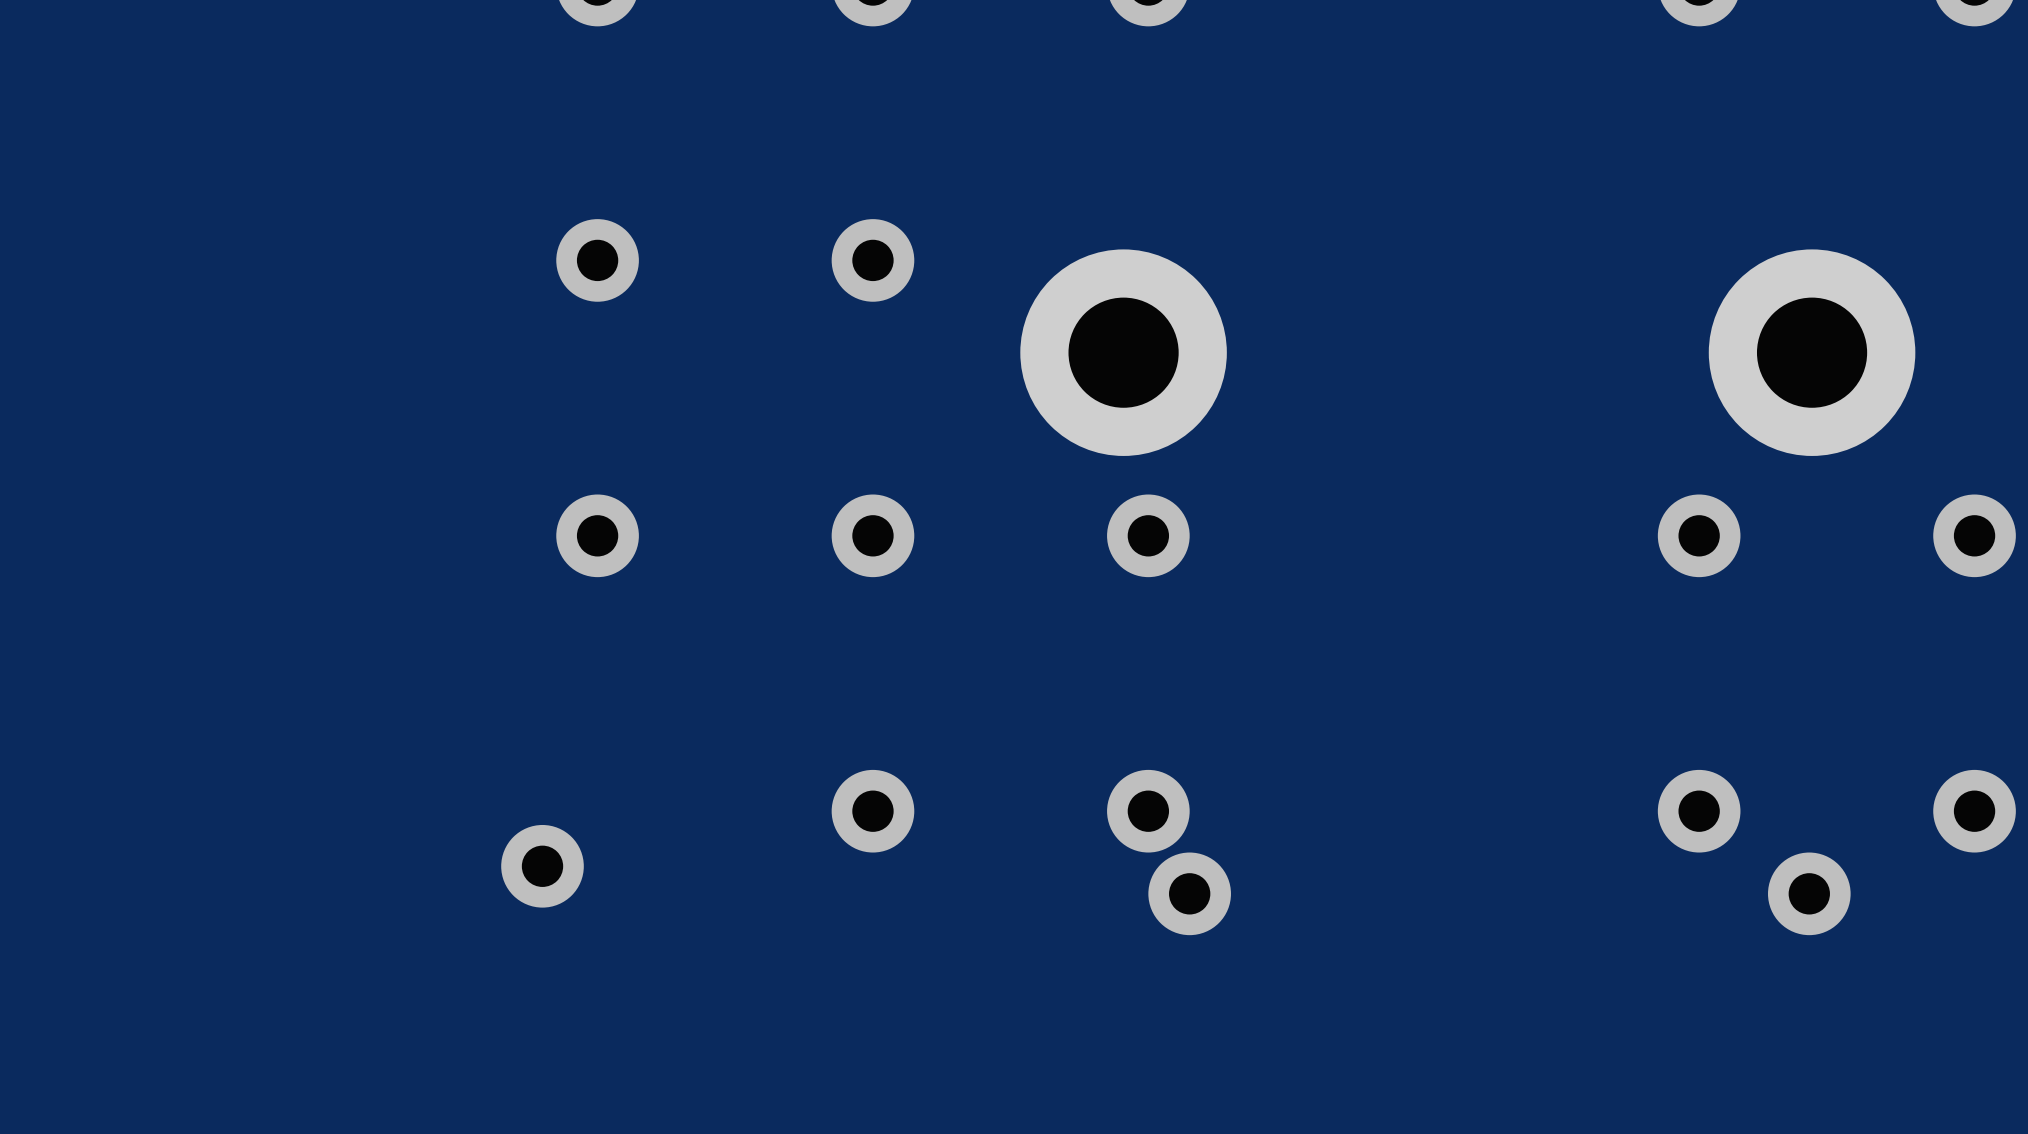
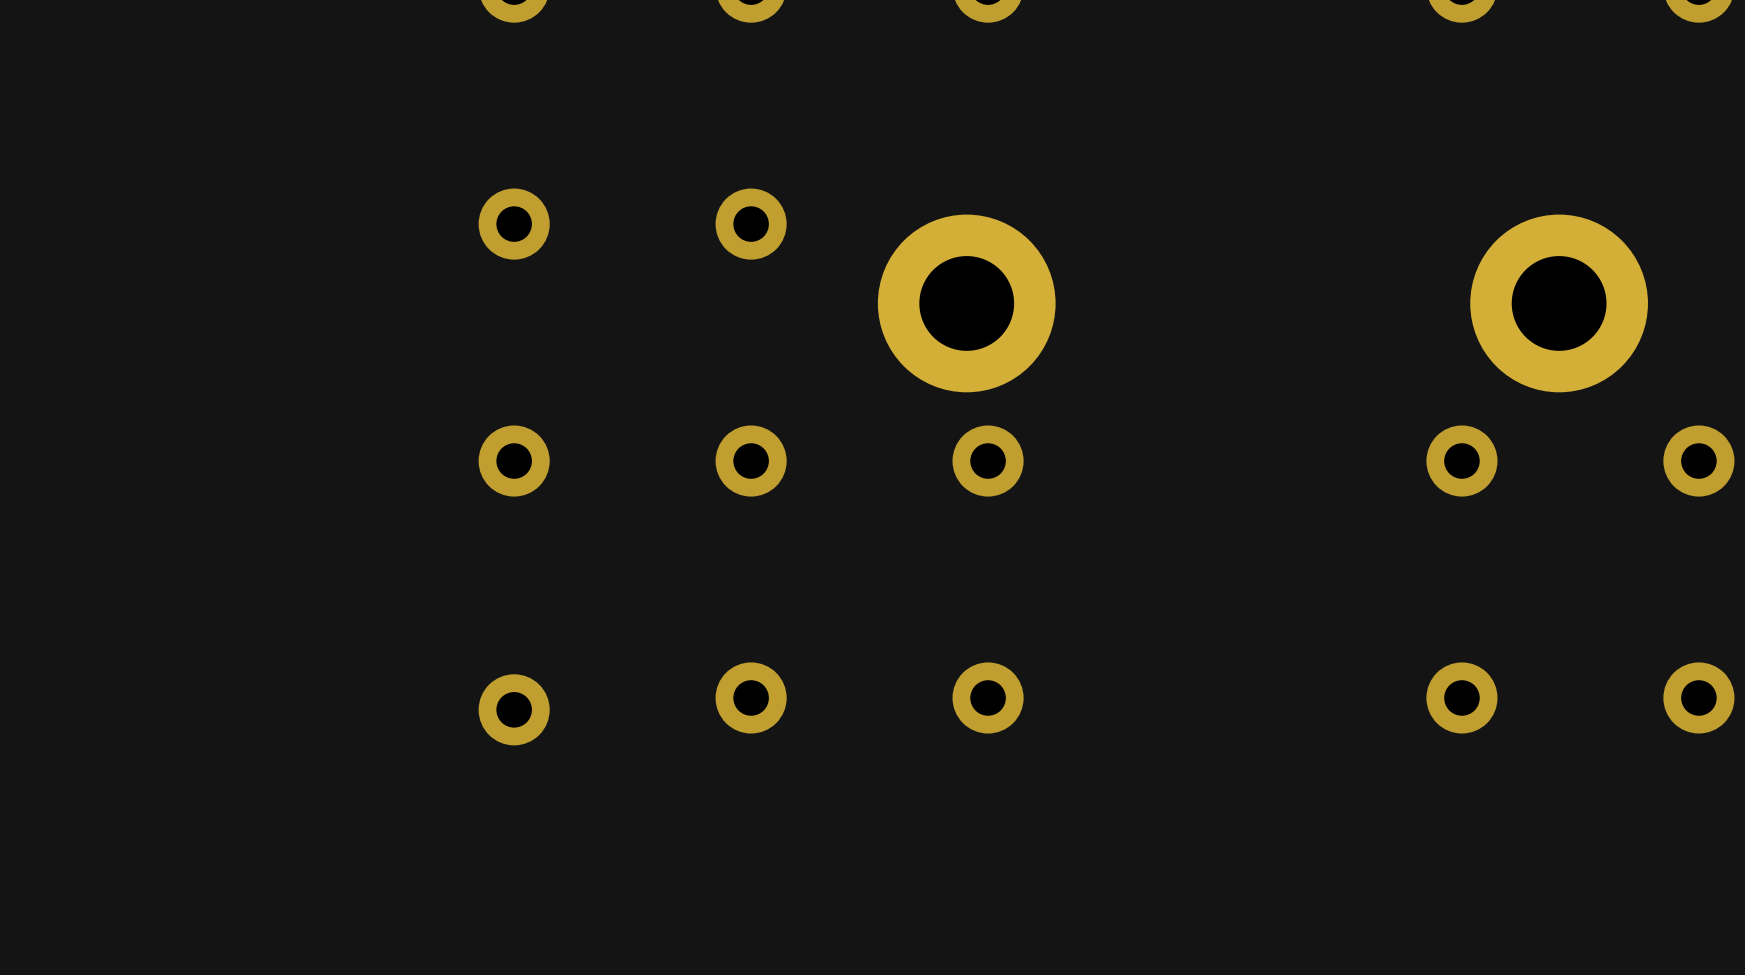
via position: (542, 866) -> (514, 709)
via: (1189, 893) -> none
via: (1809, 893) -> none

